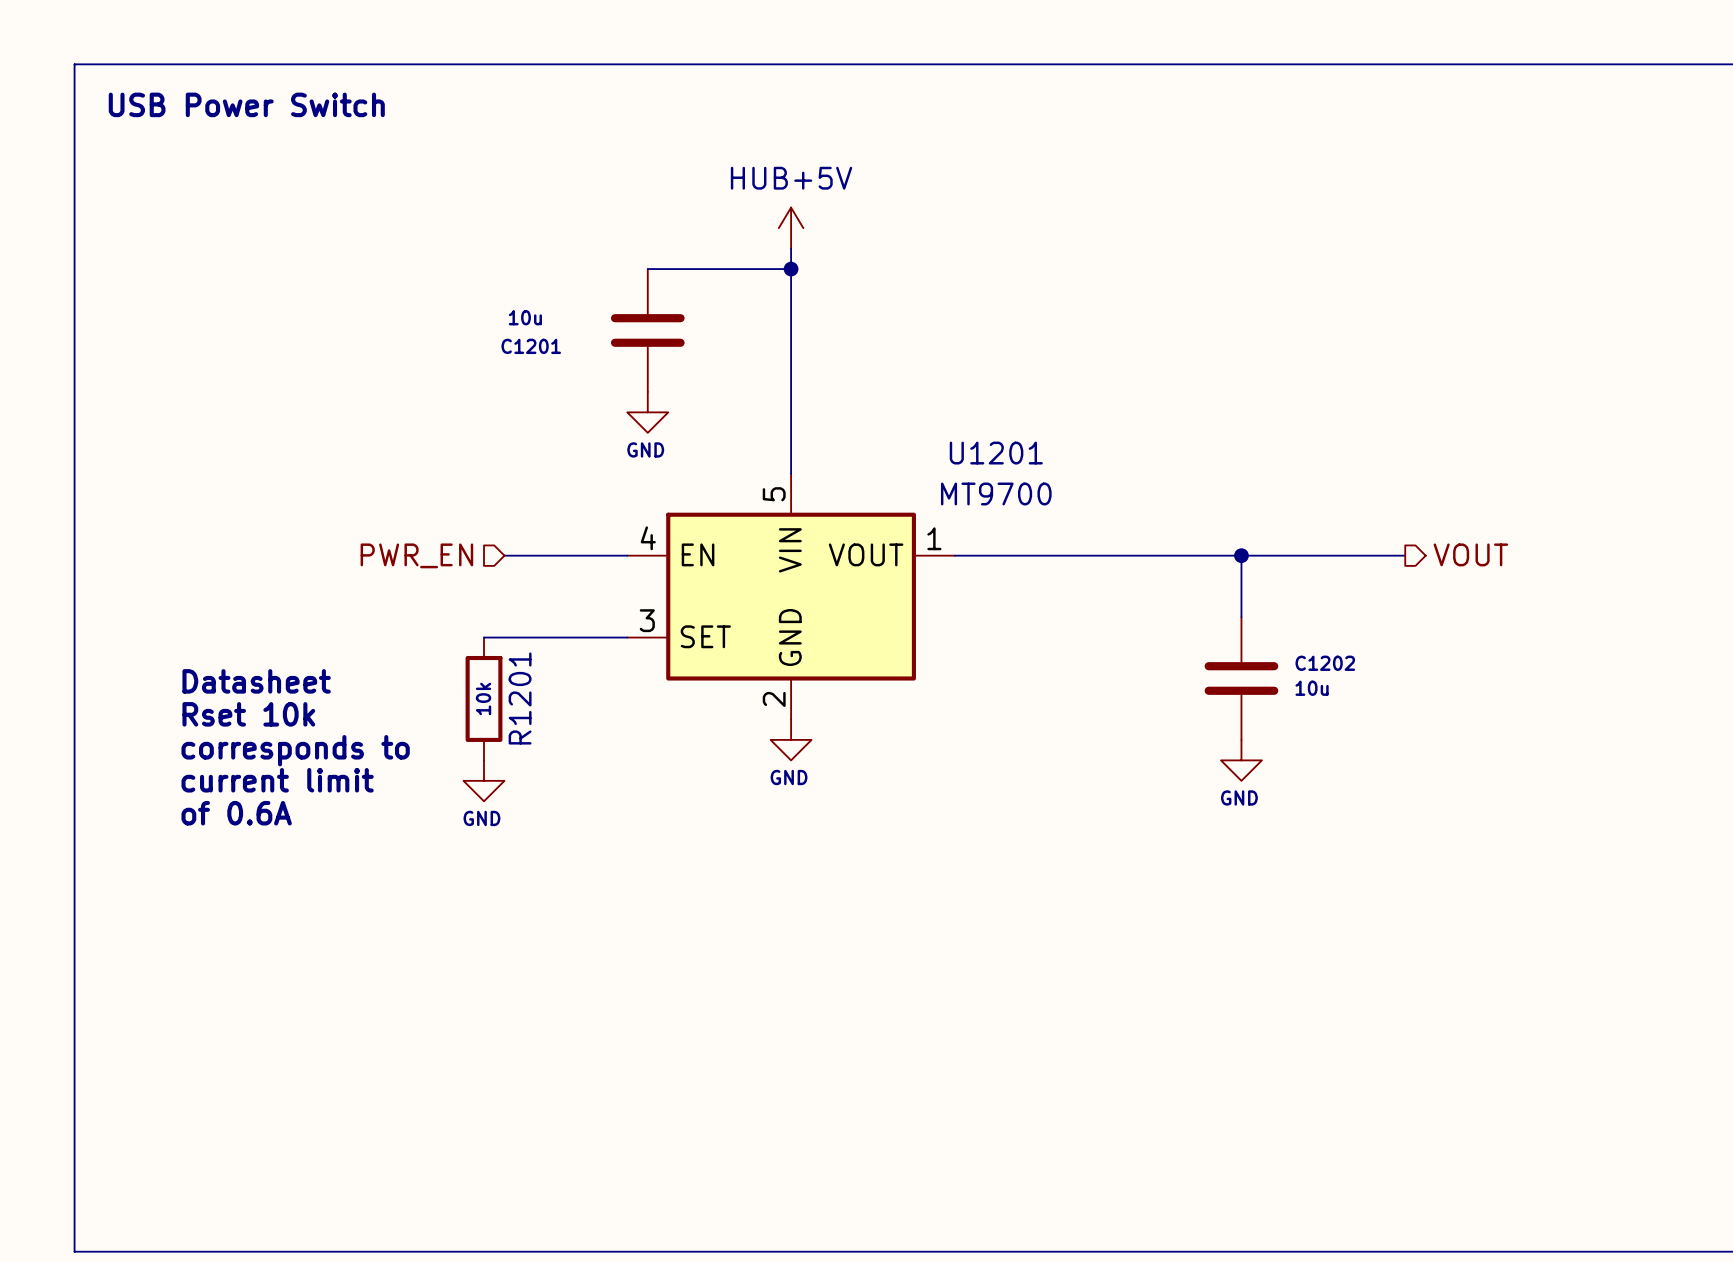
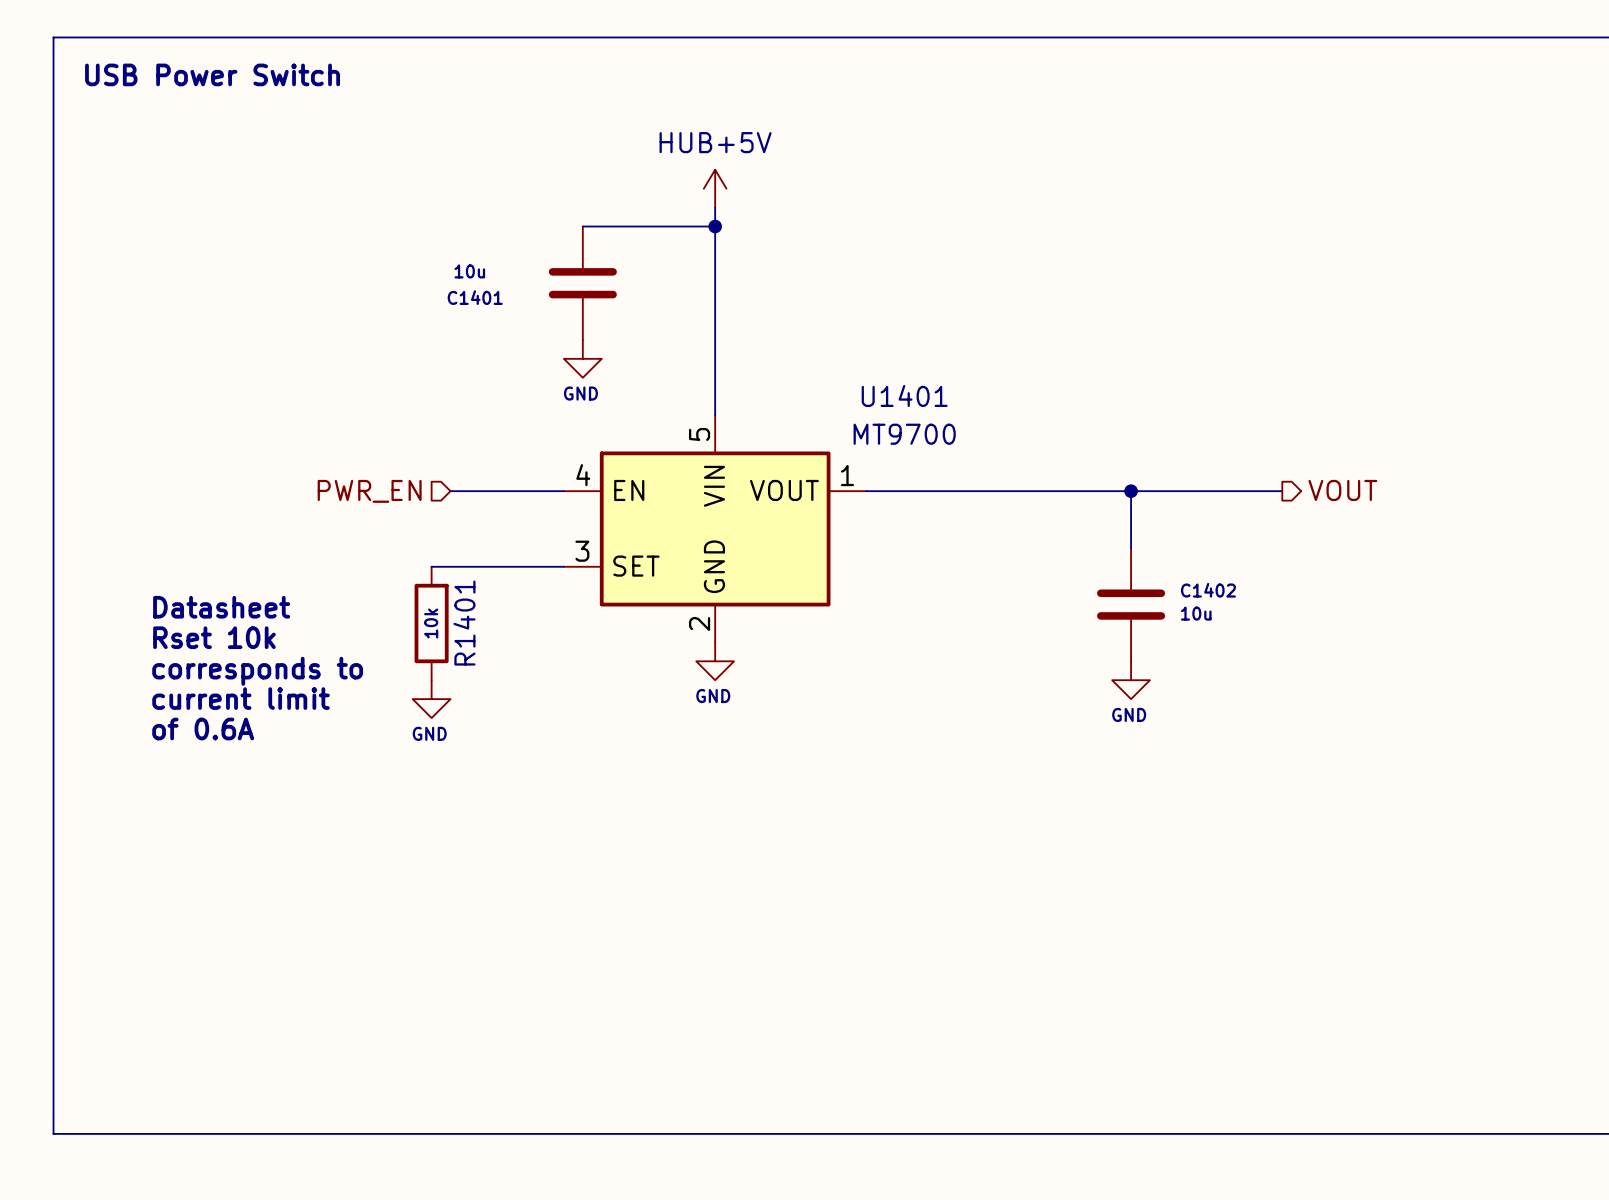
C1201 name: C1201 (531, 346) -> C1401 (475, 297)
U1201 name: U1201 (996, 453) -> U1401 (904, 395)
C1202 name: C1202 (1325, 663) -> C1402 (1208, 590)
R1201 name: R1201 (520, 698) -> R1401 (464, 623)

